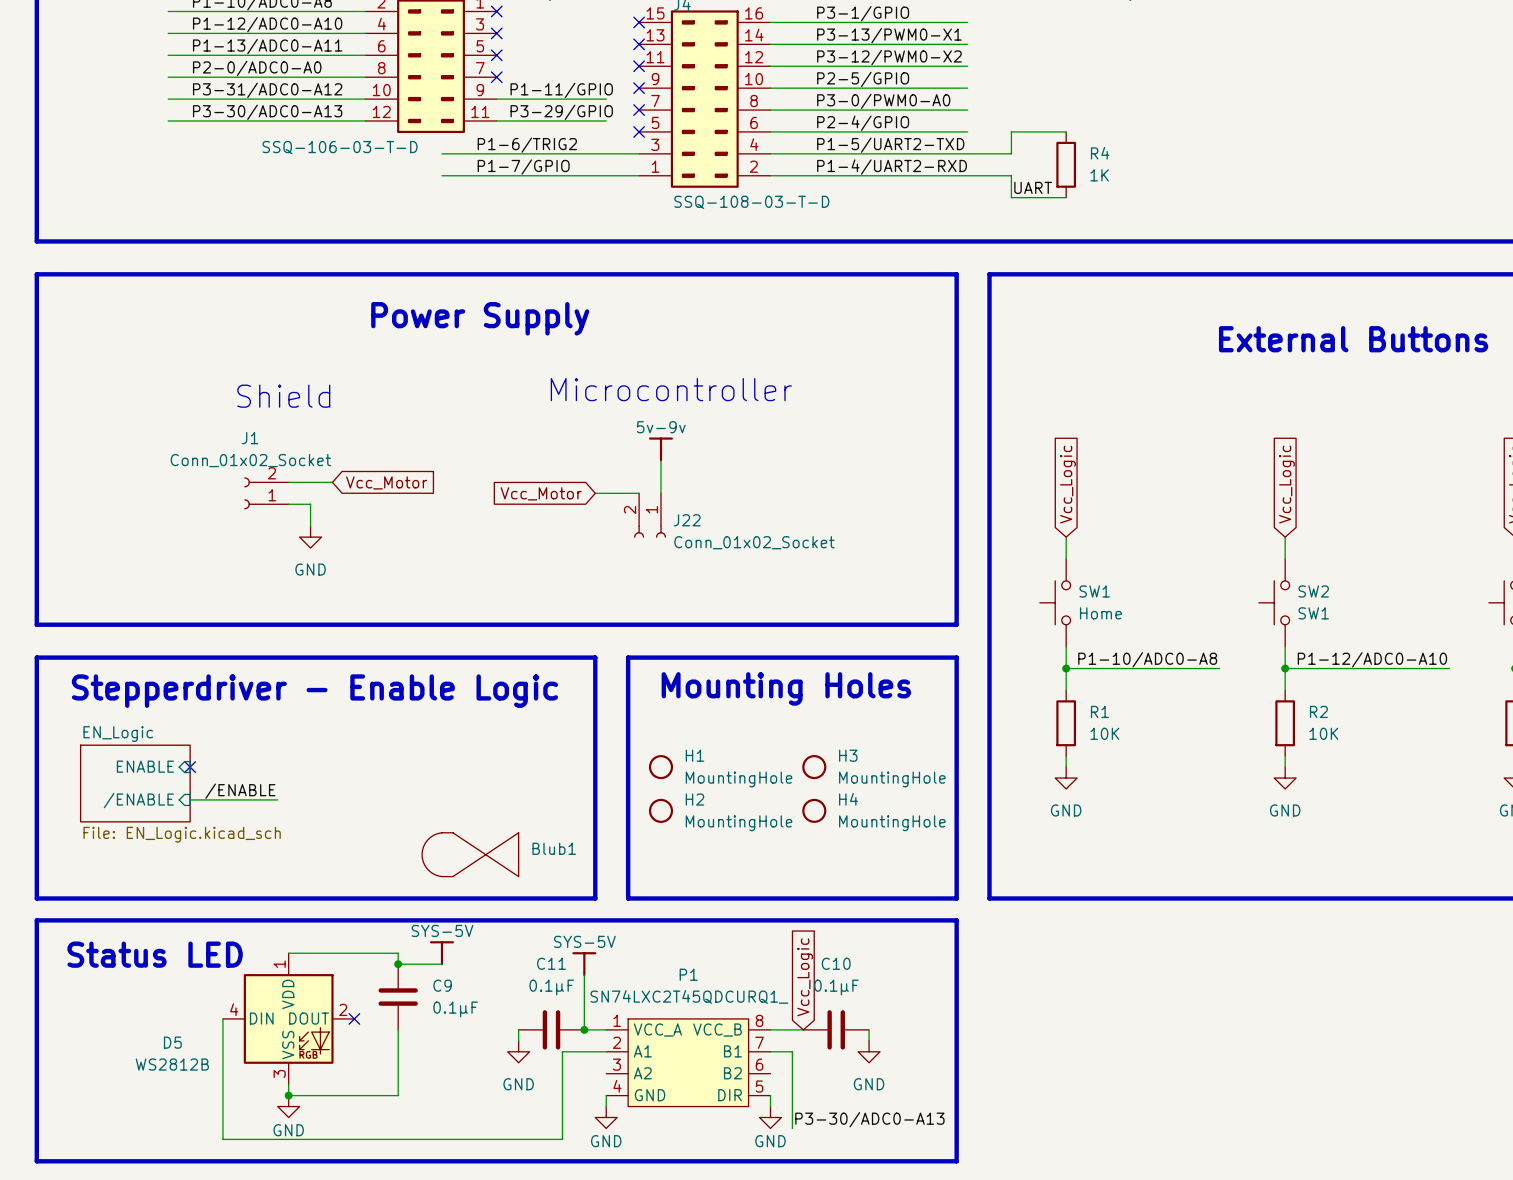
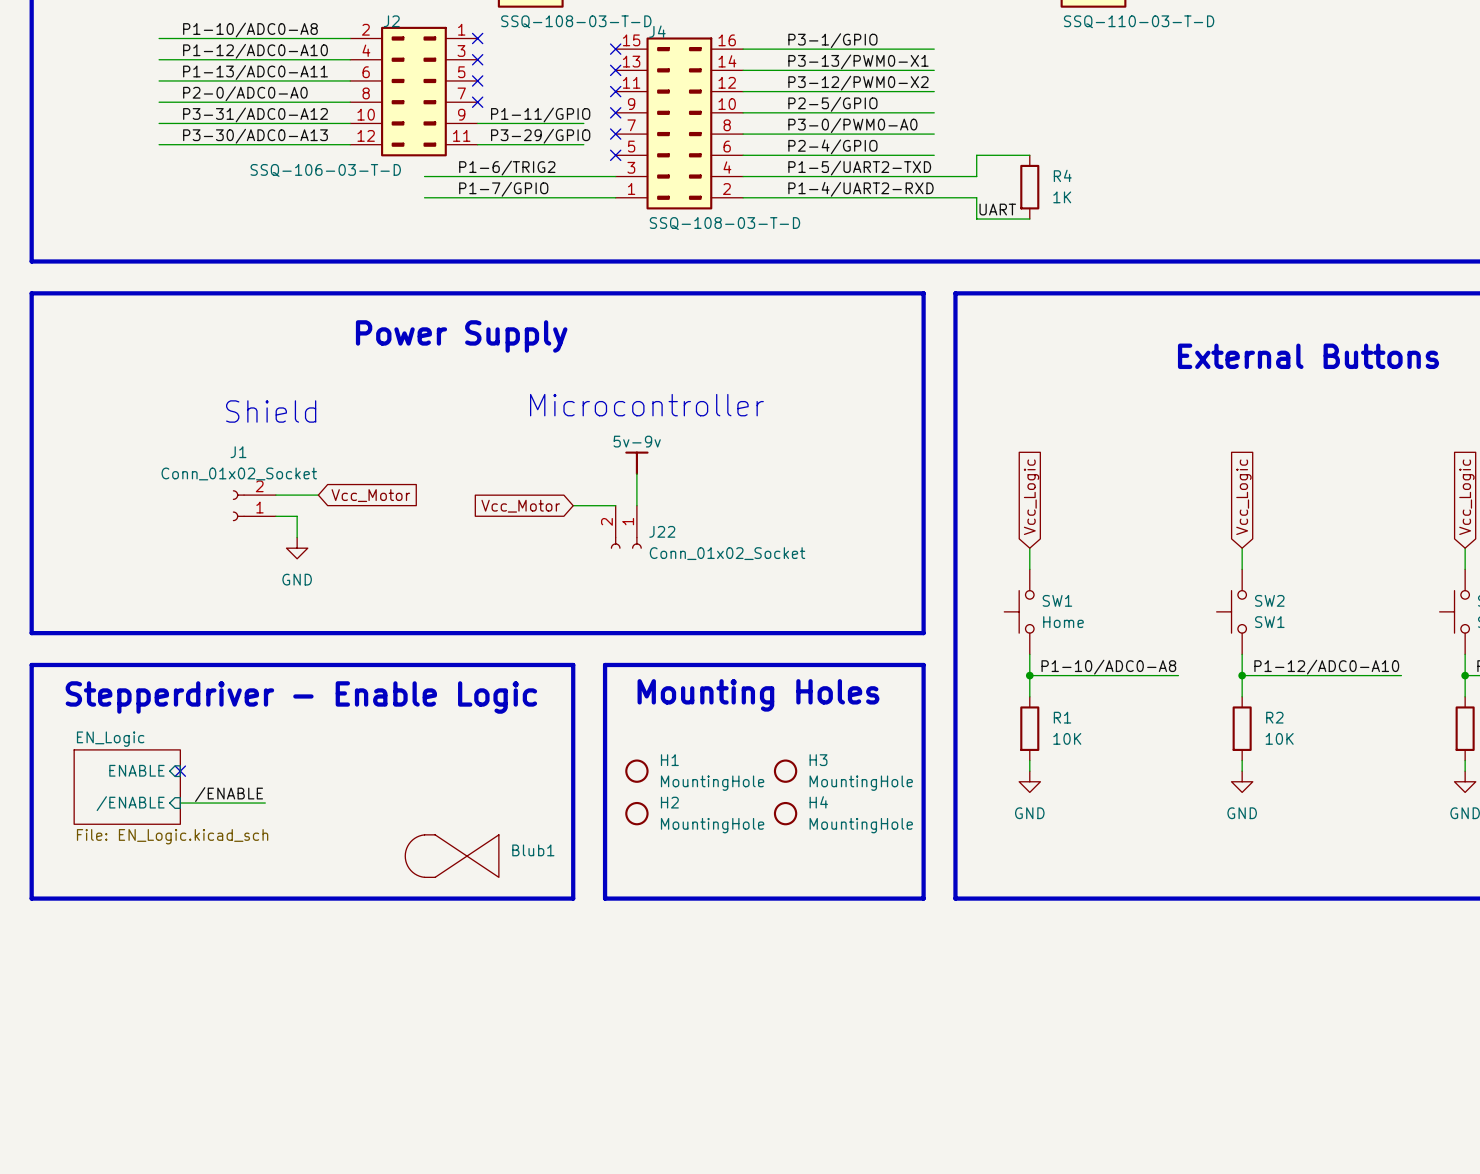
line: (36, 920) (956, 920) (956, 1161) (36, 1161) (36, 920) -> none
wire: (288, 953) (398, 953) (398, 964) (441, 964) -> none
power symbol: SYS-5V (441, 953) -> none
text: Status LED (155, 954) -> none
junction: (398, 964) -> none
power symbol: SYS-5V (584, 964) -> none
wire: (584, 975) (584, 1029) (606, 1029) -> none
global label: Vcc_Logic (805, 977) -> none
C9: 0.1µF (398, 997) -> none
wire: (222, 1018) (222, 1139) (562, 1139) (562, 1051) (606, 1051) -> none
D5: WS2812B (288, 1018) -> none
no-connect mark: (354, 1018) -> none
wire: (398, 1029) (398, 1095) (288, 1095) (288, 1084) -> none
wire: (518, 1029) (518, 1040) -> none
C11: 0.1µF (551, 1029) -> none
junction: (584, 1029) -> none
wire: (770, 1029) (803, 1029) -> none
C10: 0.1µF (836, 1029) -> none
wire: (869, 1029) (869, 1040) -> none
power symbol: GND (518, 1051) -> none
wire: (770, 1051) (792, 1051) (792, 1128) -> none
power symbol: GND (869, 1051) -> none
P1: SN74LXC2T45QDCURQ1_ (688, 1062) -> none
junction: (288, 1095) -> none
wire: (606, 1095) (606, 1106) -> none
wire: (770, 1095) (770, 1106) -> none
power symbol: GND (288, 1106) -> none
power symbol: GND (606, 1117) -> none
power symbol: GND (770, 1117) -> none
label: P3-30/ADC0-A13 (869, 1119) -> none

